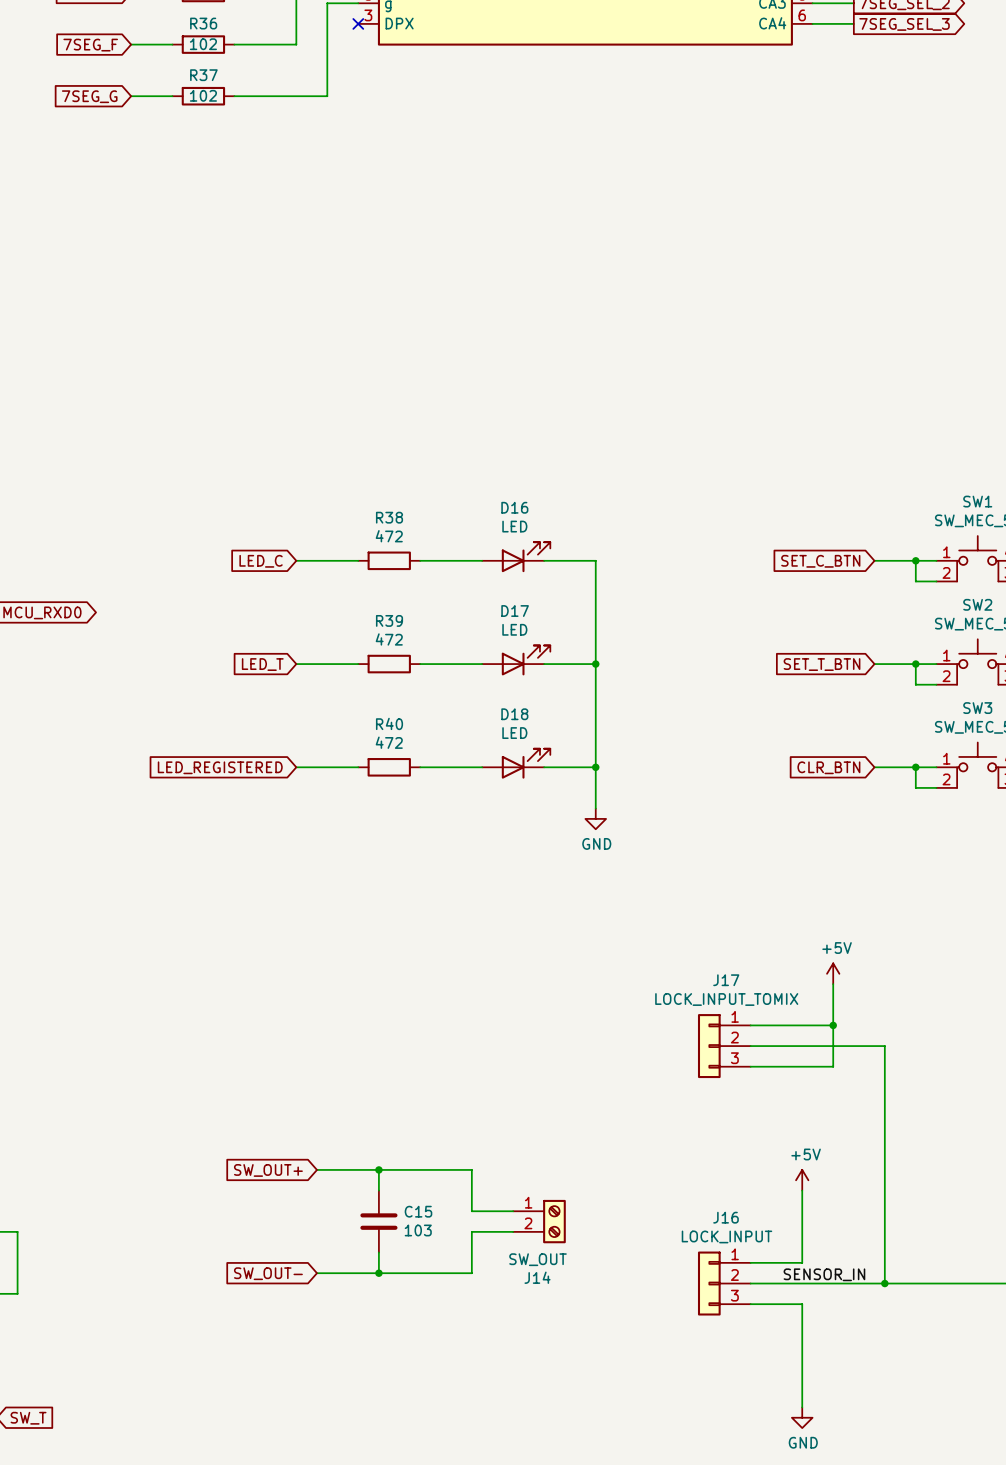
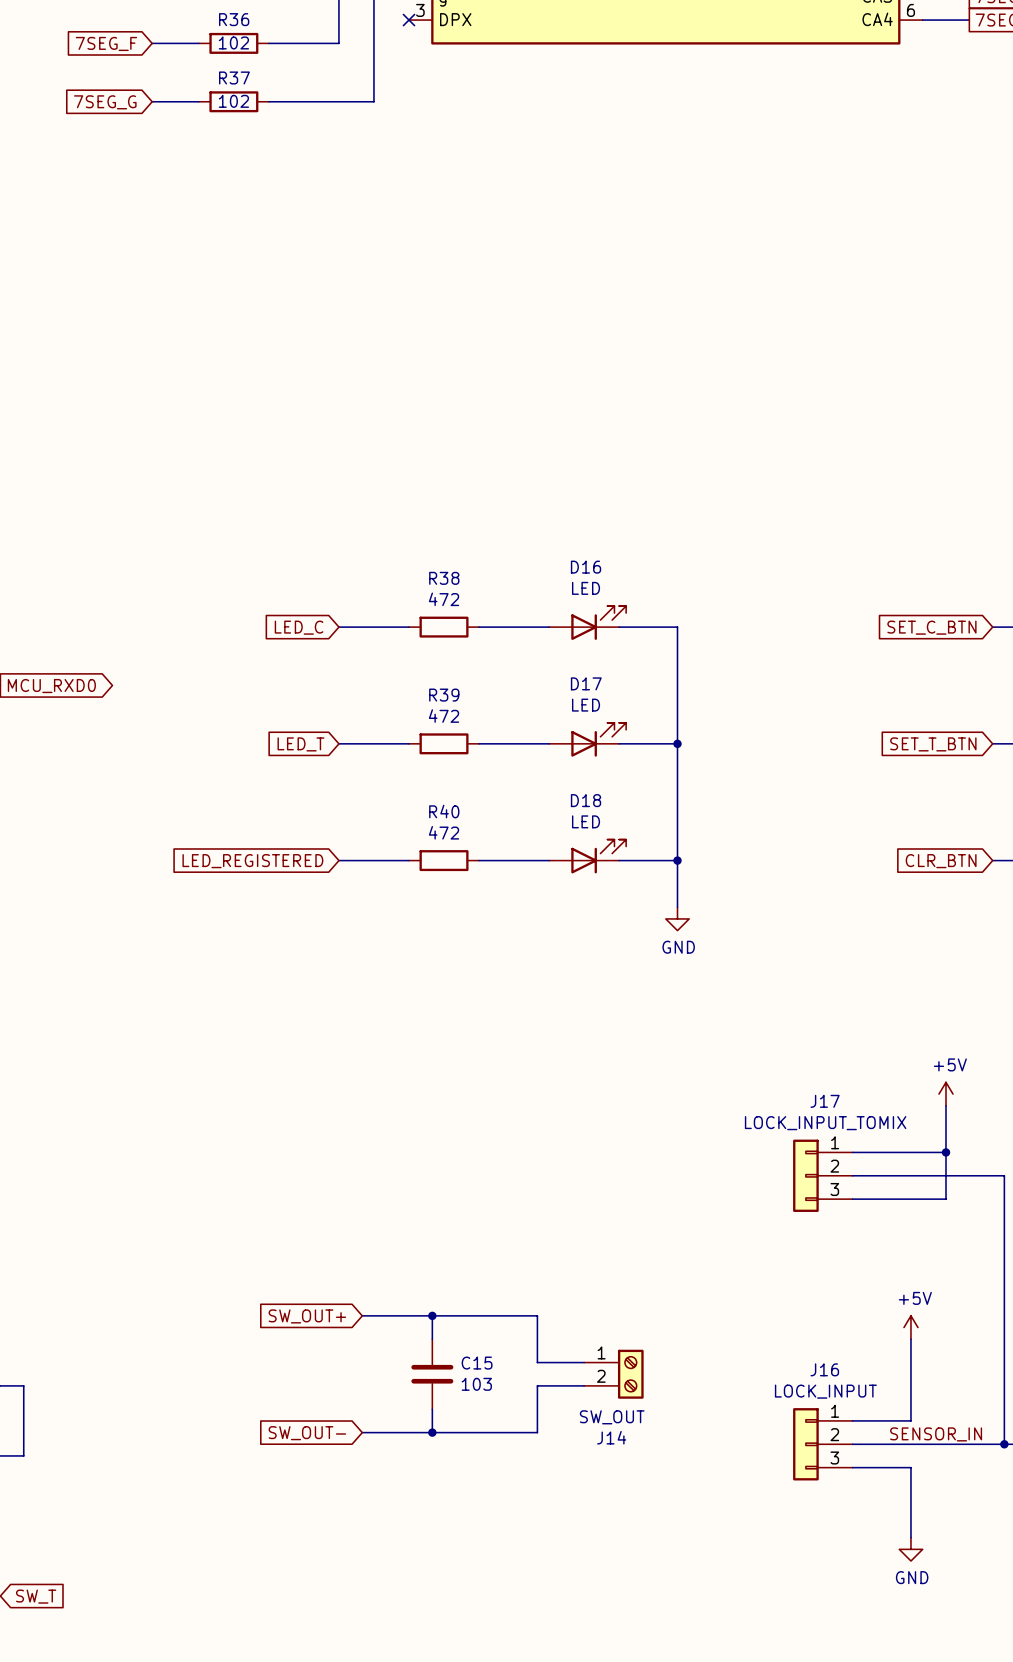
wire: (802, 1366) (802, 1407) -> none
power symbol position: GND (802, 1417) -> GND (910, 1549)

